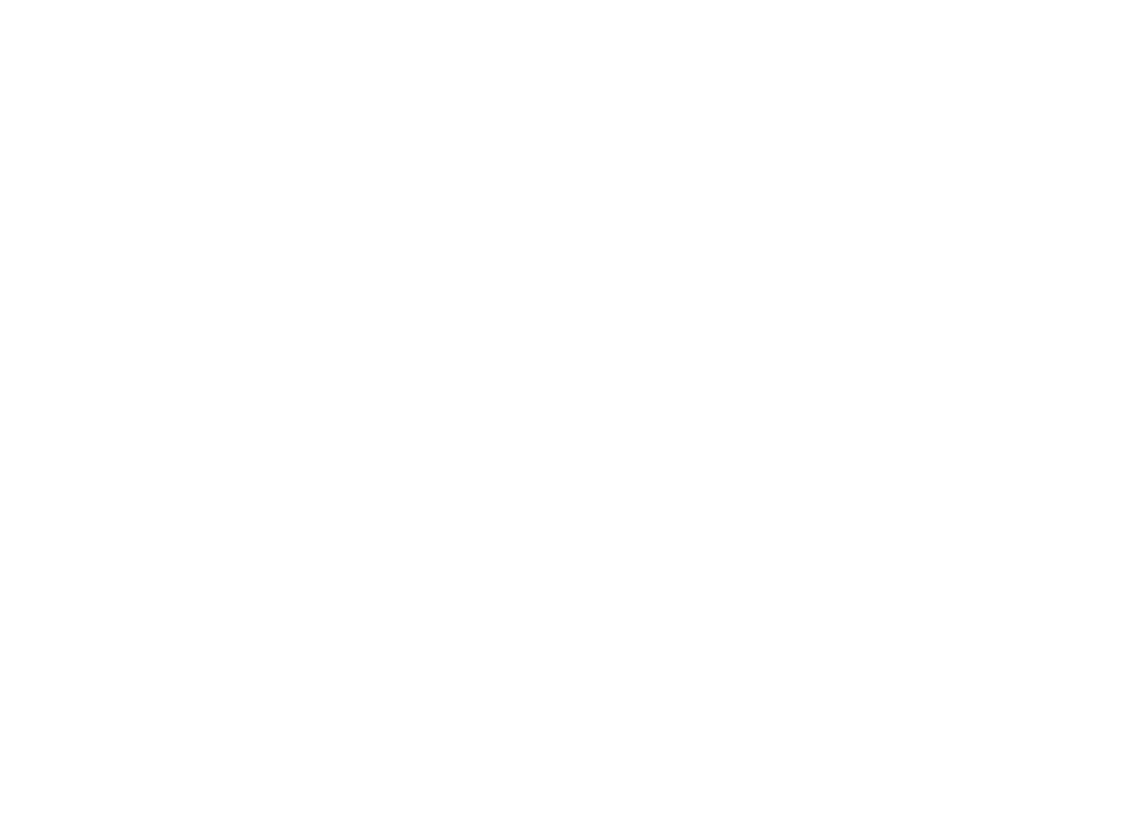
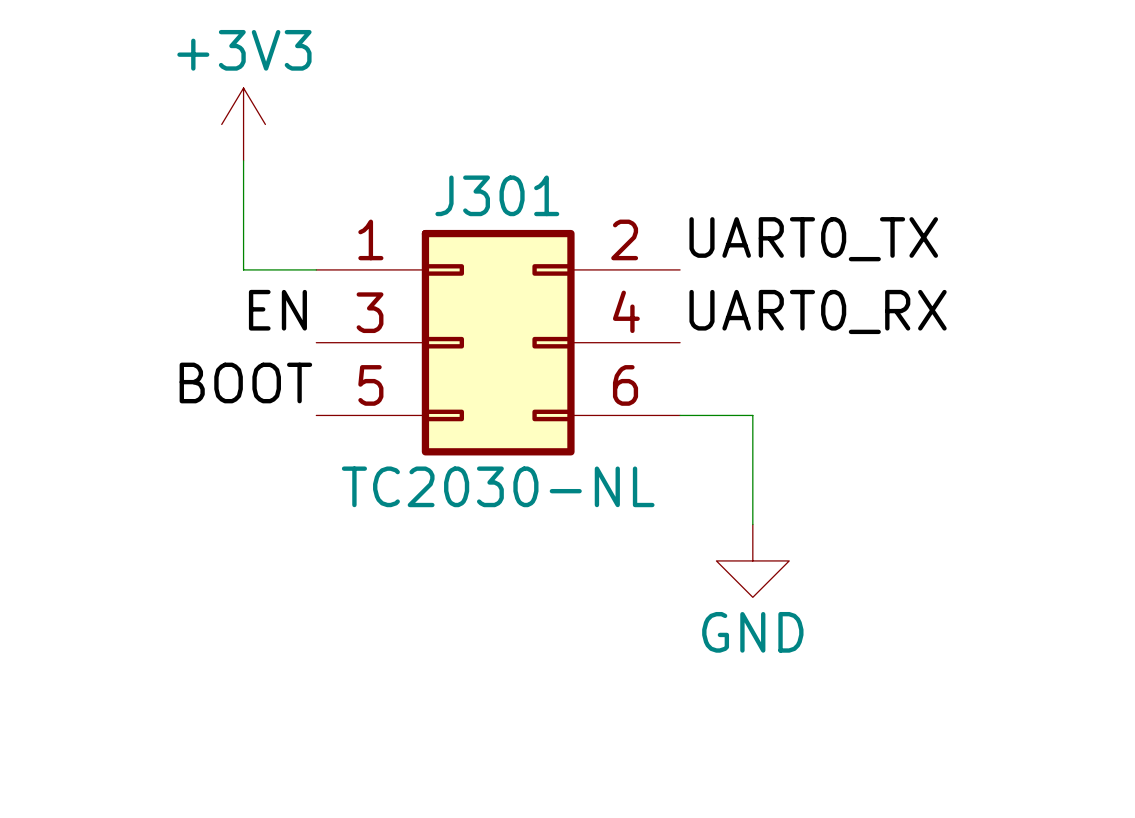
power symbol: none -> +3V3 (243, 124)
wire: none -> (243, 160) (243, 269) (316, 269)
label: none -> UART0_TX (813, 239)
label: none -> EN (277, 310)
label: none -> UART0_RX (818, 311)
J301: none -> TC2030-NL (498, 342)
label: none -> BOOT (245, 382)
wire: none -> (680, 415) (752, 415) (752, 524)
power symbol: none -> GND (752, 560)

